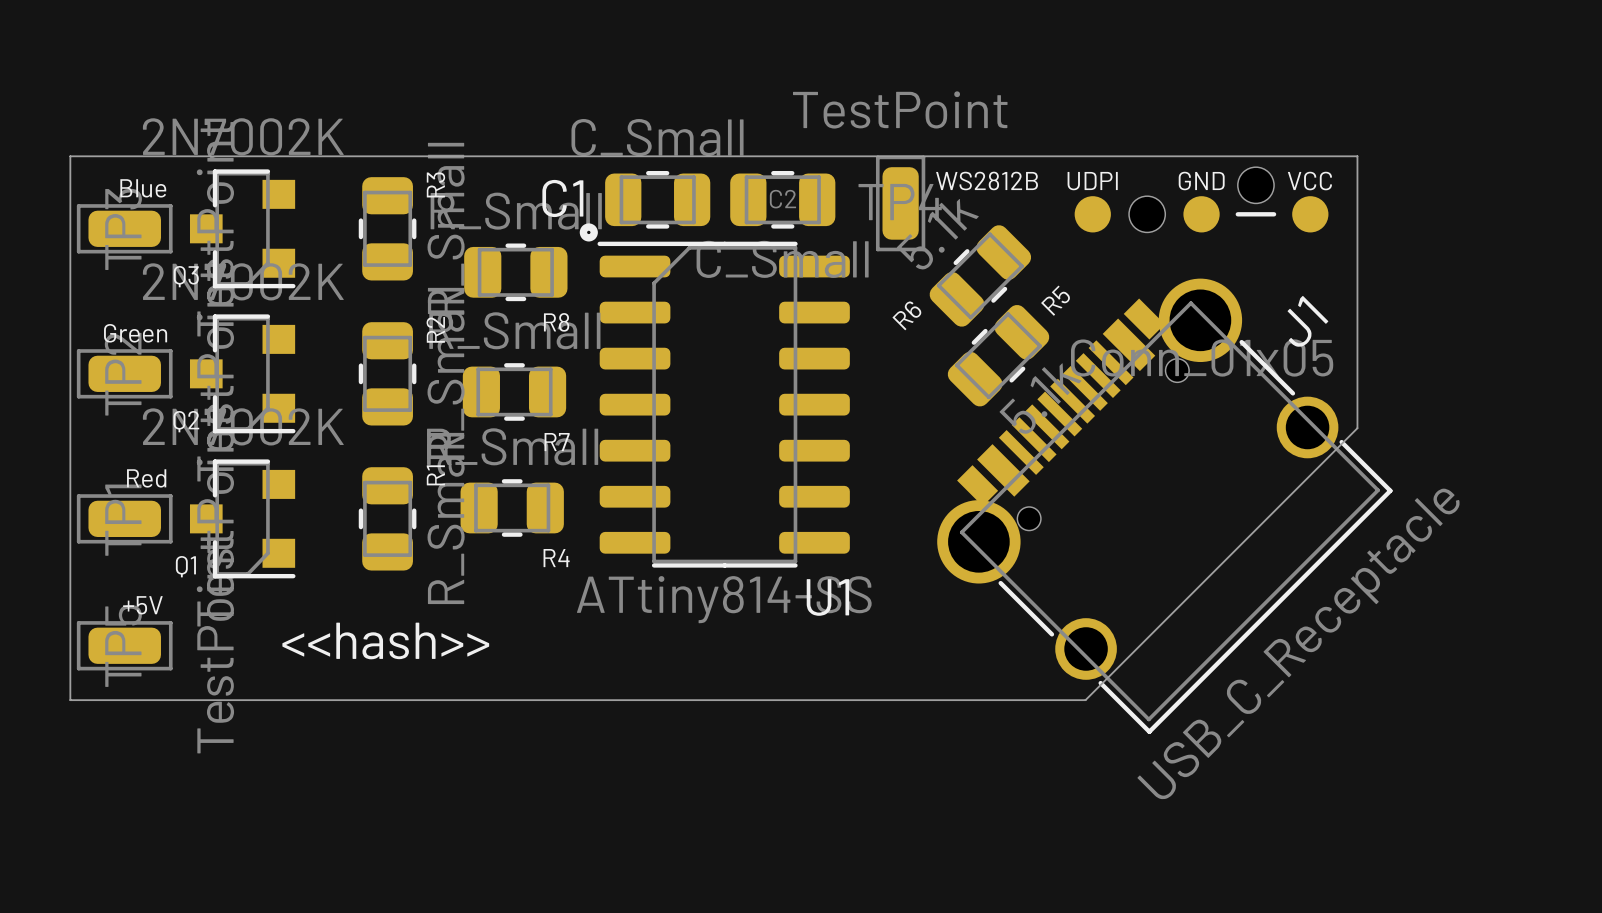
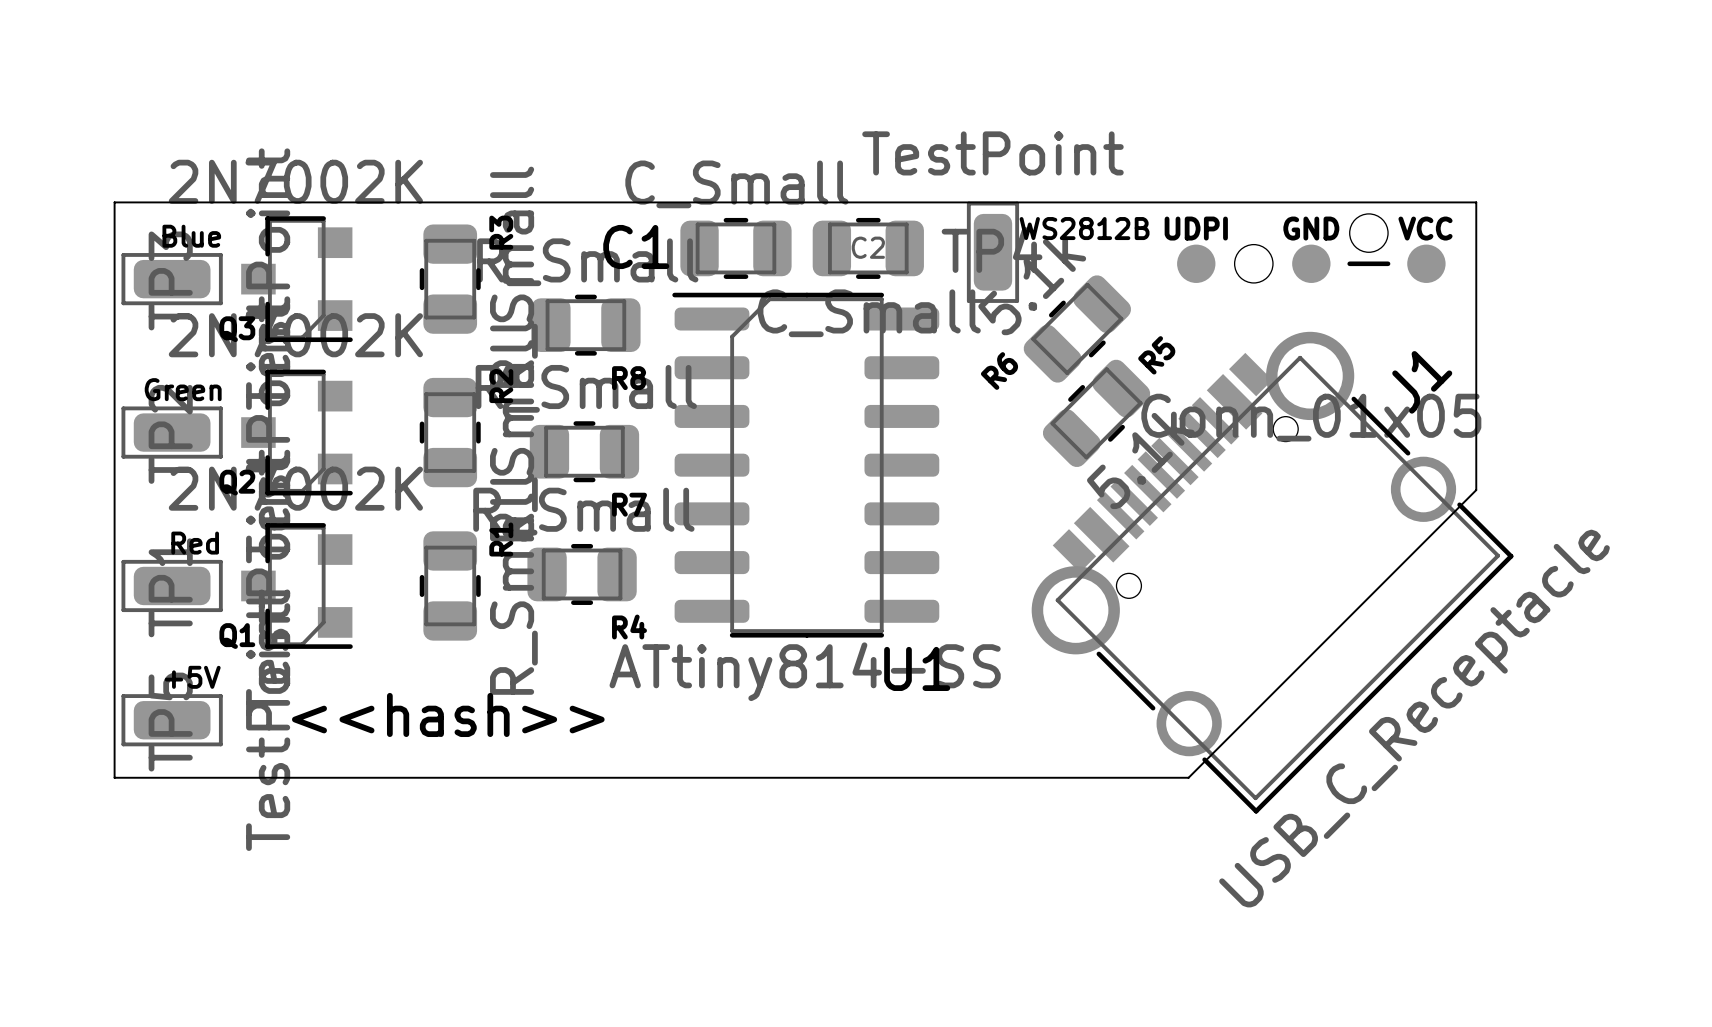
drawing: [579, 223, 598, 242] -> none

